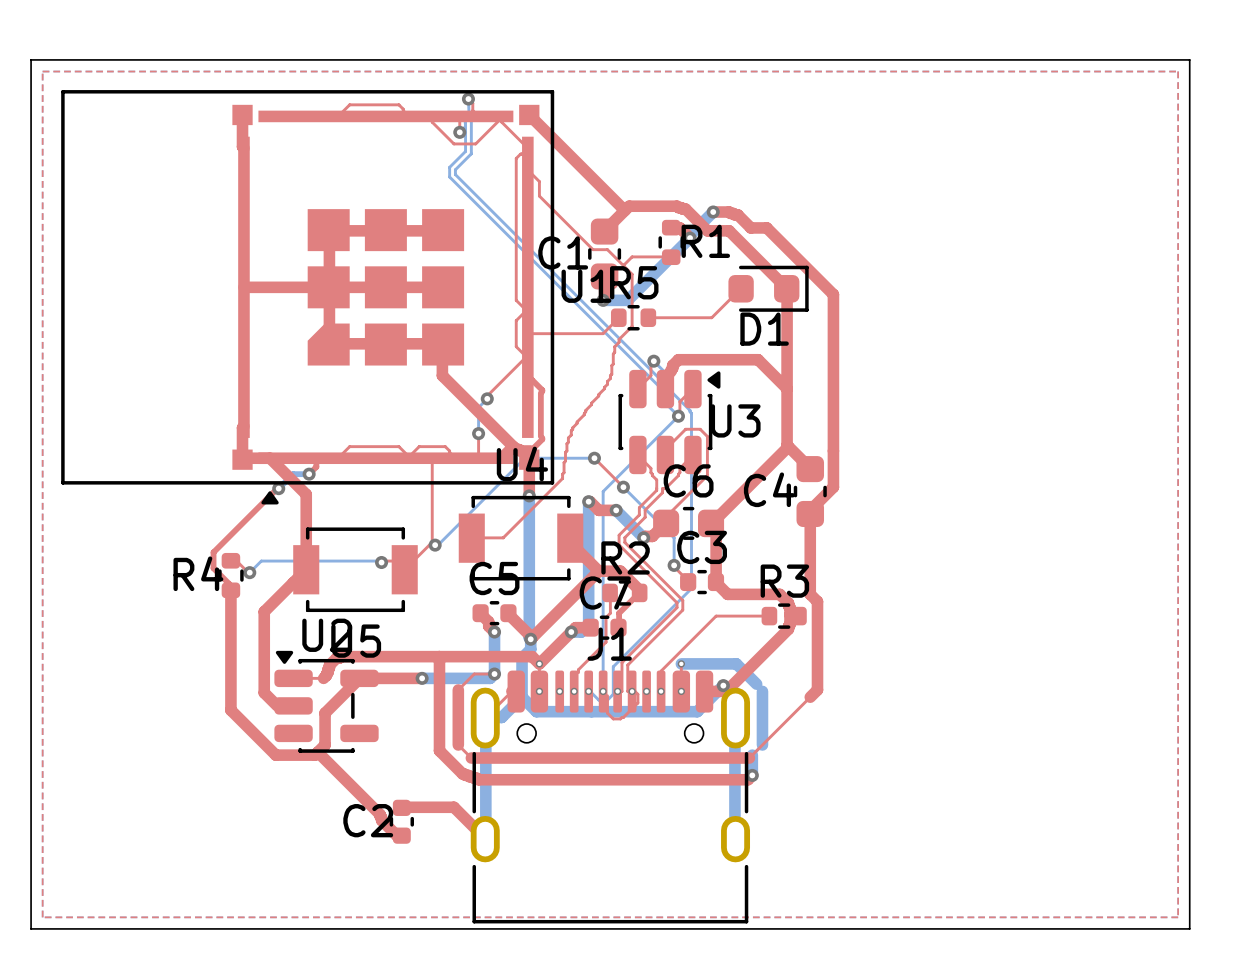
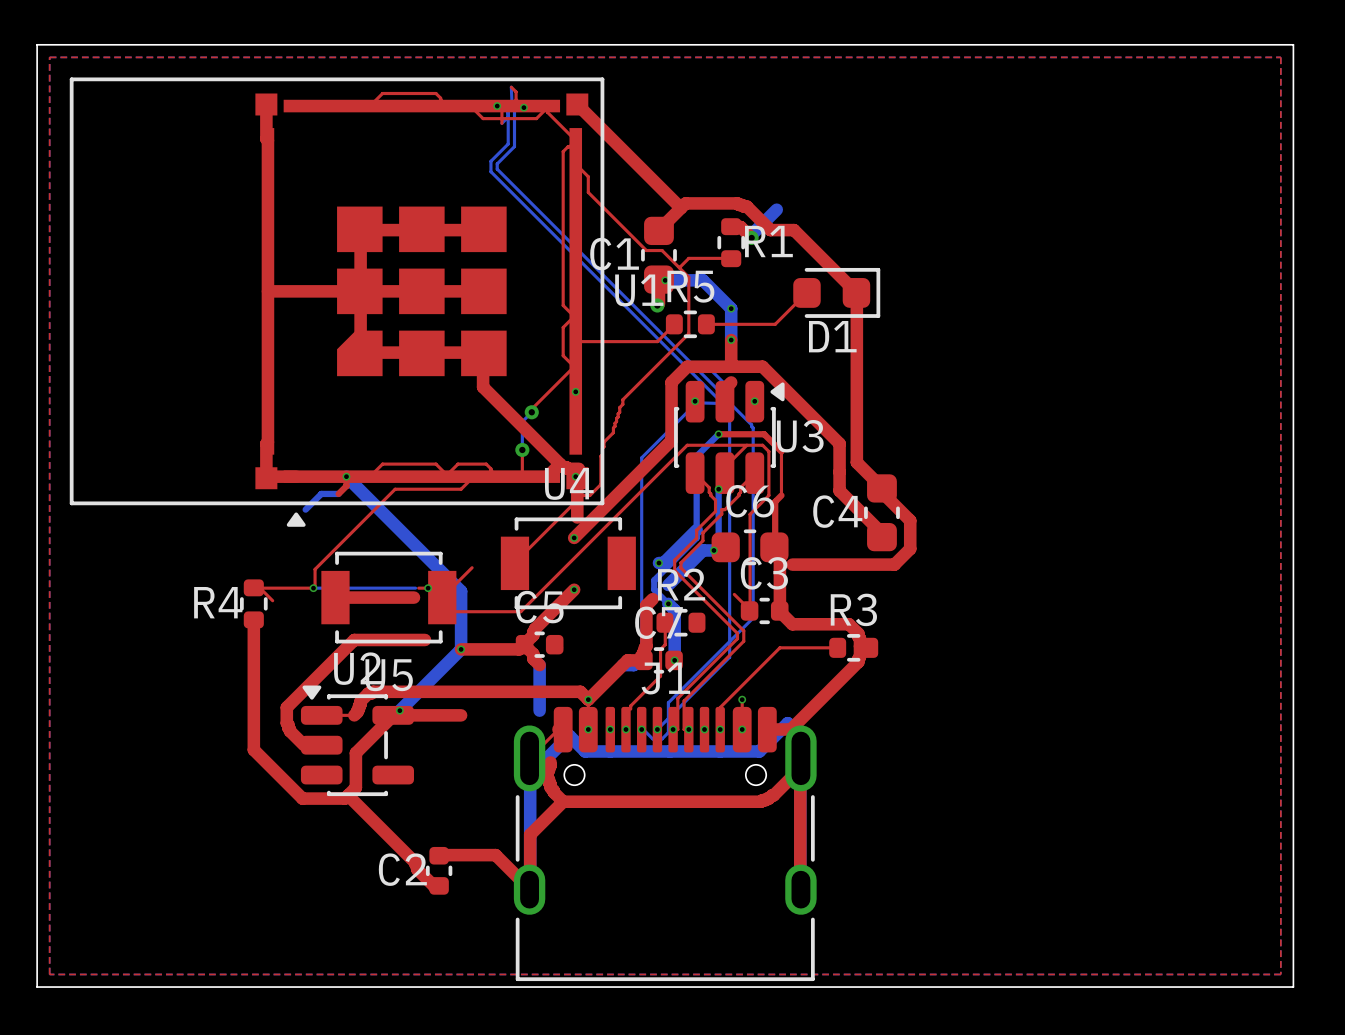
via: (468, 99) -> none
via: none -> (497, 106)
top track: (432, 117) (432, 122) (453, 143) (475, 143) (491, 128) -> (472, 107) (483, 118) (536, 118)
via: none -> (523, 107)
via: (459, 132) -> none
top track: (713, 212) (729, 212) (737, 214) (750, 227) (766, 227) (833, 294) (833, 487) (810, 511) -> (613, 498) (671, 440) (671, 382) (687, 366) (762, 366) (839, 443) (839, 490) (881, 534)
via: (713, 212) -> none
bottom track: (690, 238) (627, 300) (603, 300) -> none
bottom track: none -> (665, 280) (702, 280) (731, 308) (731, 340)
via: none -> (665, 280)
via: none -> (731, 308)
top track: none -> (731, 340) (731, 366)
via: none -> (731, 340)
top track: (619, 339) (614, 346) (611, 374) (607, 384) (571, 430) (566, 443) (562, 478) -> (674, 347) (622, 399) (613, 432) (604, 442) (600, 456) (600, 484) (589, 495) (582, 495) (514, 563)
top track: (653, 361) (650, 364) (650, 375) (637, 388) -> none
via: (653, 361) -> none
top track: (671, 369) (678, 359) (758, 359) (787, 388) -> none
top track: (527, 380) (532, 380) (542, 390) (542, 439) (527, 453) (527, 458) -> none
via: none -> (575, 391)
via: none -> (695, 401)
top track: (692, 388) (679, 401) (678, 416) -> none
via: none -> (754, 401)
bottom track: none -> (696, 402) (641, 457) (641, 523)
bottom track: none -> (696, 402) (722, 403)
bottom track: (663, 390) (663, 401) (678, 416) (603, 491) (603, 691) -> (729, 402) (729, 657) (657, 729)
via: (678, 416) -> none
bottom track: none -> (718, 434) (696, 456) (696, 537) (654, 580) (654, 589) (674, 610) (674, 660)
via: none -> (718, 434)
top track: none -> (746, 445) (687, 445) (520, 611) (456, 611)
top track: (705, 435) (707, 475) (665, 517) (665, 523) (652, 536) (643, 537) -> (768, 451) (768, 495) (750, 514) (750, 610)
top track: (788, 446) (711, 523) -> (718, 434) (764, 434) (781, 451) (781, 495) (775, 501) (775, 547)
top track: (270, 458) (306, 494) (306, 569) (264, 611) (264, 691) -> (424, 639) (354, 639) (286, 707) (286, 723) (289, 729)
bottom track: none -> (346, 476) (461, 591) (461, 649) (399, 710)
via: none -> (346, 476)
via: none -> (575, 476)
top track: (594, 458) (623, 487) -> none
bottom track: (594, 458) (524, 458) (436, 546) -> none
via: (594, 458) -> none
top track: (432, 459) (432, 542) (435, 545) -> (472, 478) (461, 489) (395, 489) (315, 569) (313, 588) (260, 588)
bottom track: none -> (718, 489) (718, 545) (713, 550) (702, 550) (668, 585)
via: none -> (718, 489)
top track: none -> (881, 488) (881, 492) (910, 520) (910, 548) (894, 564) (792, 564)
via: (309, 474) -> none
top track width: thin (562, 478) (526, 514) -> thick (613, 498) (574, 537)
bottom track: (623, 487) (674, 537) (674, 565) -> none
via: (623, 487) -> none
top track: (277, 488) (213, 552) (213, 568) (229, 584) (230, 590) -> none
via: (278, 488) -> none
bottom track: (529, 495) (530, 649) (522, 658) (522, 697) -> none
via: (529, 495) -> none
top track: (588, 501) (598, 510) (616, 510) -> none
bottom track width: thick (588, 501) (588, 624) -> thin (641, 523) (641, 657)
via: (588, 501) -> none
bottom track: none -> (696, 530) (663, 563) (658, 563)
bottom track: (616, 510) (643, 537) -> none
via: (616, 510) -> none
top track: (526, 514) (503, 537) (471, 537) -> none
via: none -> (574, 537)
top track: (810, 514) (810, 594) (817, 601) (817, 689) (749, 758) (698, 758) -> (800, 768) (773, 795) (761, 801)
via: none -> (713, 550)
top track: (569, 537) (569, 542) (598, 571) (620, 571) (639, 590) (639, 592) (619, 613) (619, 627) -> none
via: none -> (658, 563)
via: (643, 537) -> none
via: (435, 545) -> none
via size: [375, 555, 389, 570] -> [424, 584, 433, 593]
bottom track: (285, 561) (261, 561) (249, 572) -> none
via: none -> (313, 588)
top track: none -> (574, 589) (534, 628) (533, 635) (519, 649) (461, 649)
via: none -> (574, 589)
via: (674, 565) -> none
top track: none -> (335, 597) (414, 597)
via: (249, 572) -> none
via: none -> (668, 603)
top track: (593, 576) (530, 639) -> (646, 605) (646, 646) (643, 652) (644, 655) (643, 660)
top track: (510, 616) (532, 637) -> none
via: none -> (461, 649)
via: none -> (674, 660)
via: (494, 632) -> none
via: (571, 632) -> none
via: (530, 639) -> none
top track: (439, 656) (439, 750) (465, 775) (478, 779) (747, 779) (752, 775) -> none
bottom track: (681, 663) (736, 663) (762, 691) (762, 745) (752, 755) (752, 775) -> none
via: none -> (399, 710)
top track: (494, 674) (474, 674) (458, 689) (458, 745) (471, 758) (516, 758) -> none
via: (494, 674) -> none
bottom track: (493, 675) (490, 678) (422, 678) -> none
via: (422, 678) -> none
via: (723, 685) -> none
top track: (632, 691) (637, 694) (637, 702) (620, 718) (613, 718) (607, 713) (607, 695) -> none
top track: none -> (800, 757) (800, 889)
top track: none -> (550, 762) (547, 778) (553, 792) (563, 801) (530, 834) (530, 889)
via: (752, 775) -> none

